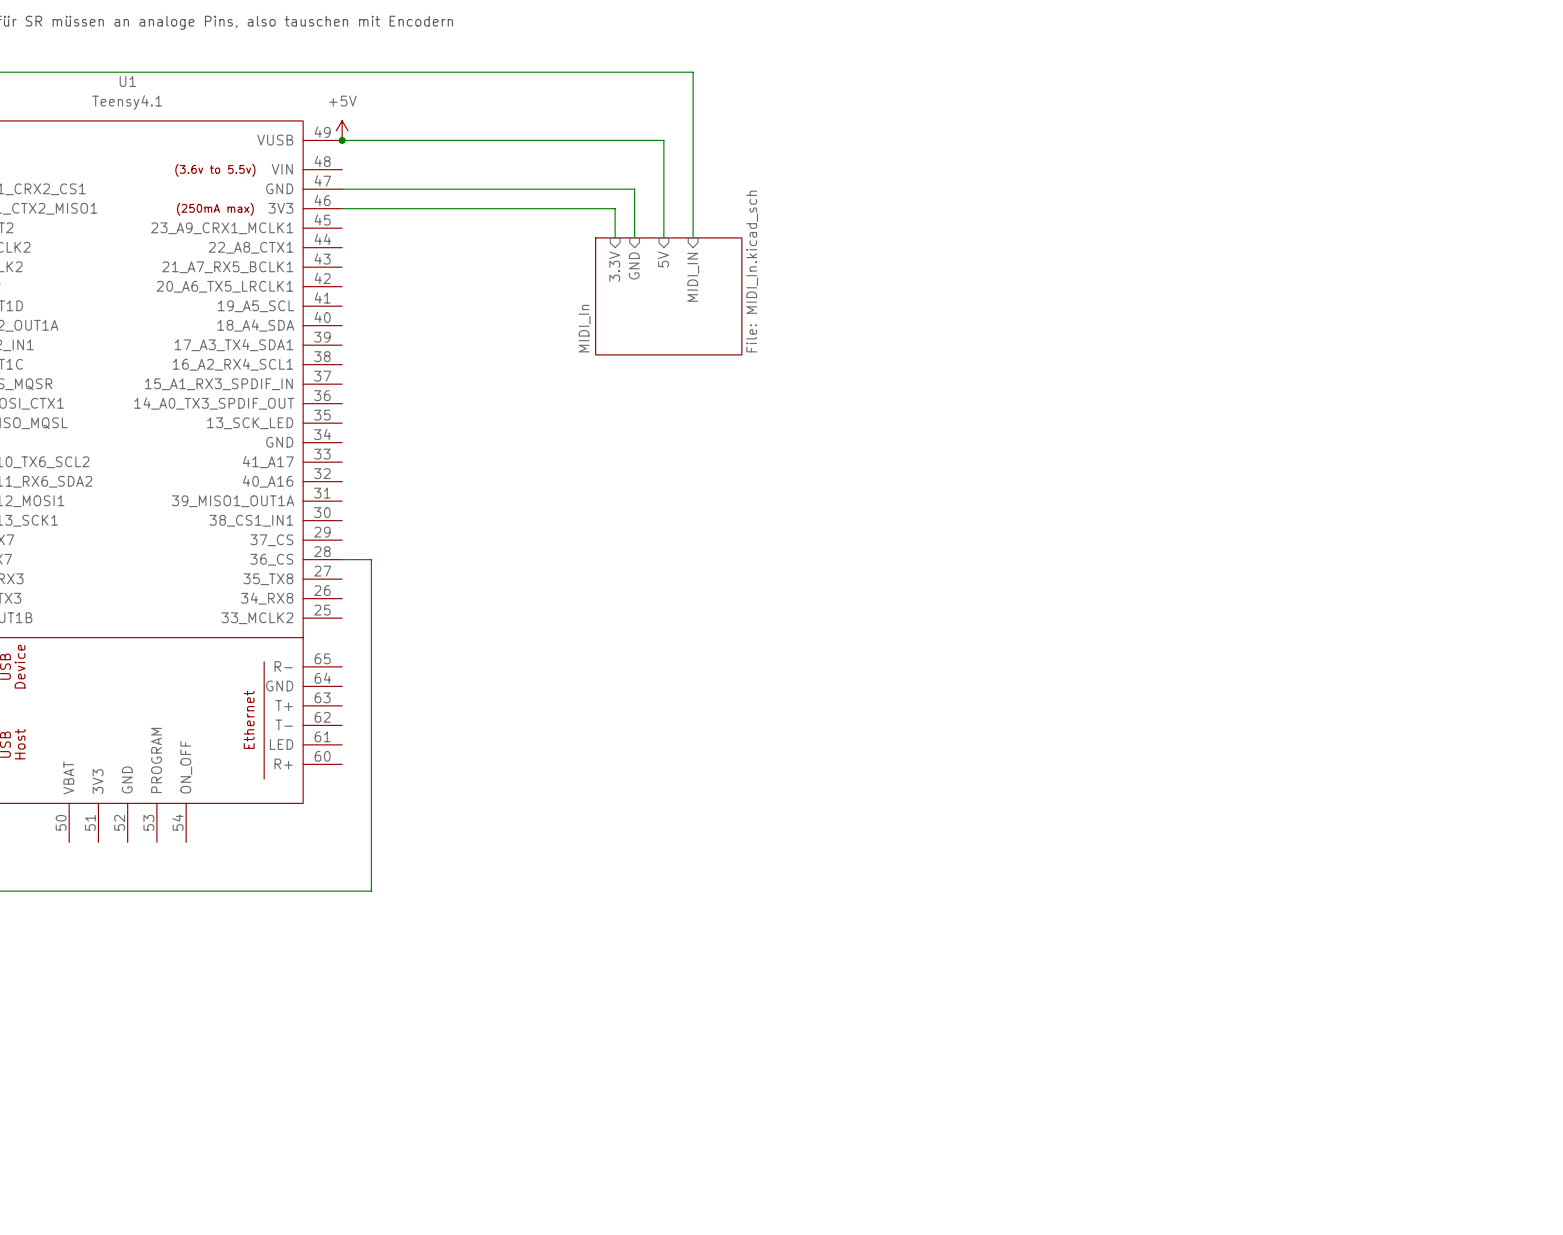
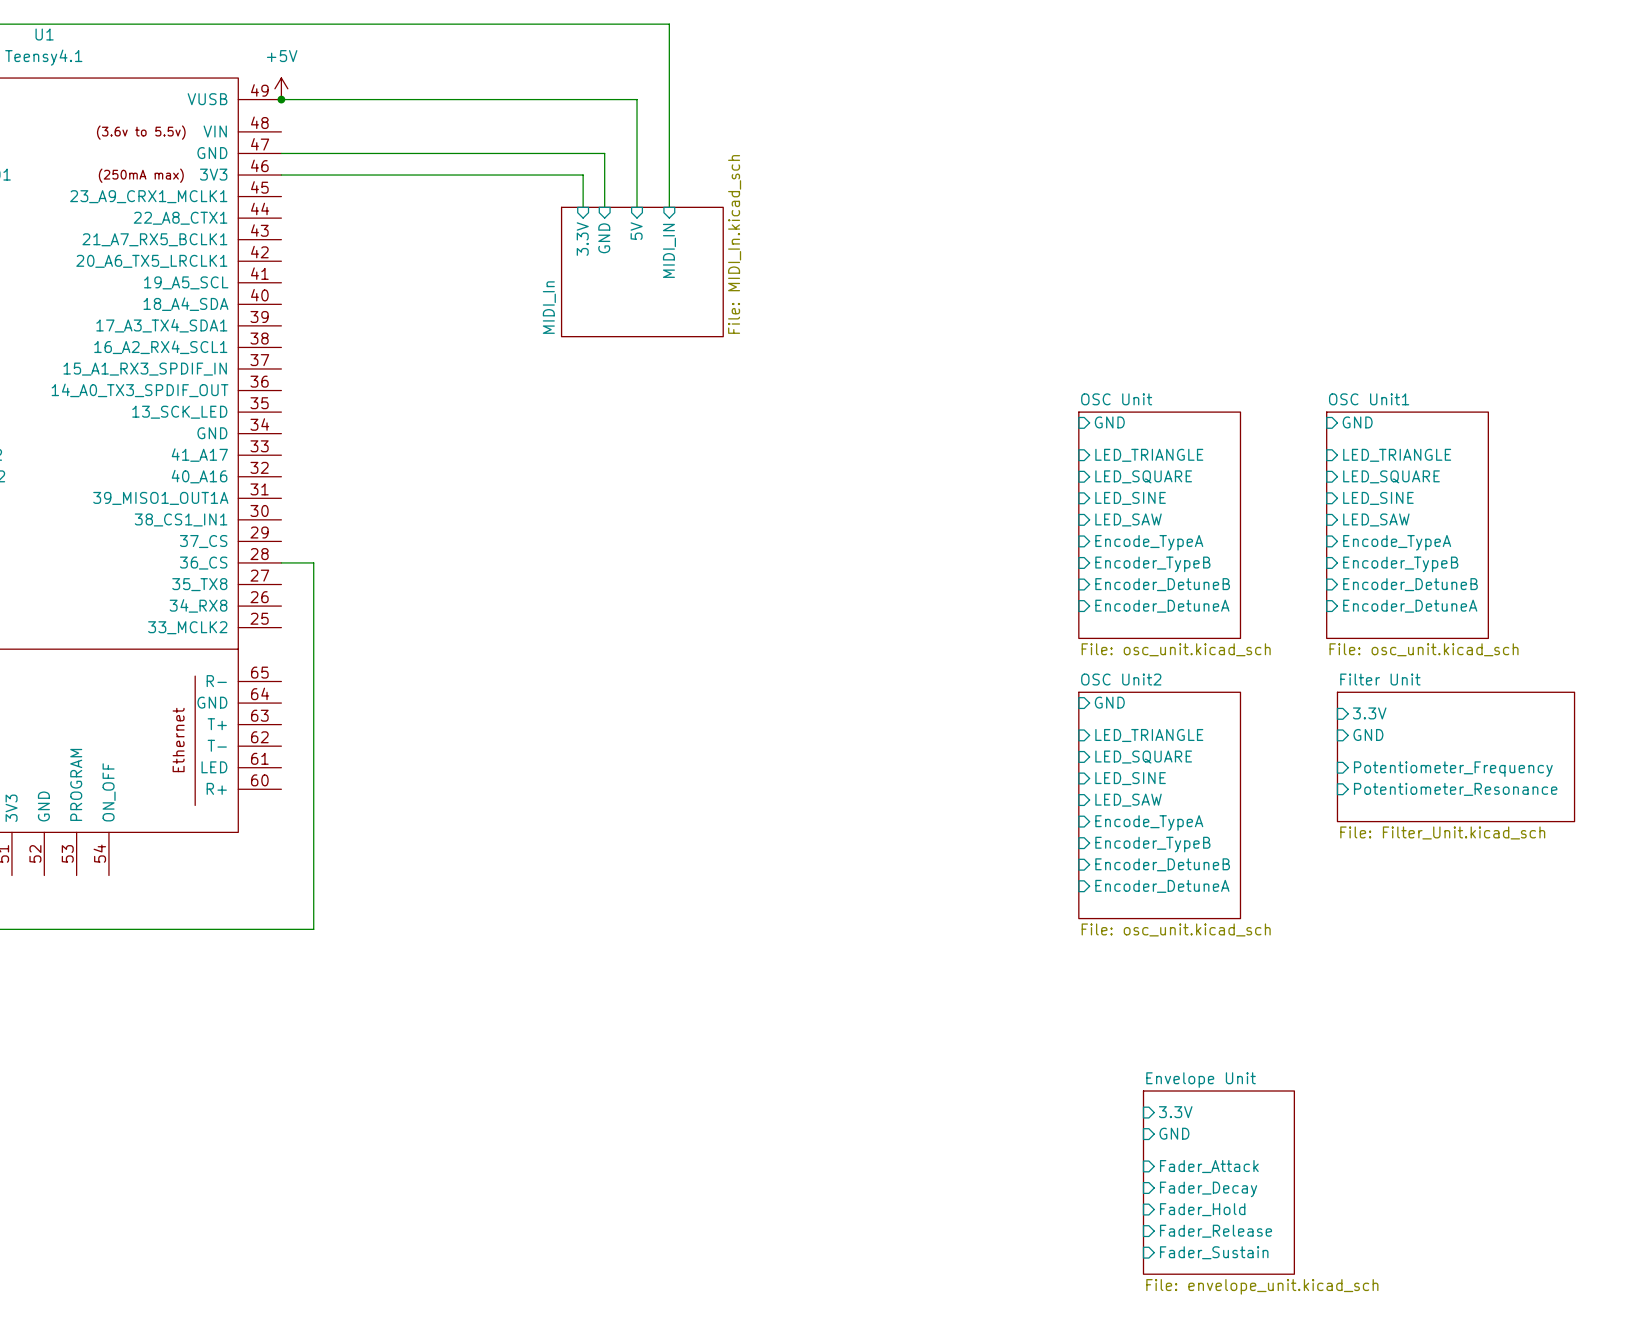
sheet pin: none -> GND (1109, 422)
sheet pin: none -> GND (1357, 422)
sheet pin: none -> LED_TRIANGLE (1149, 455)
sheet pin: none -> LED_TRIANGLE (1397, 455)
sheet pin: none -> LED_SQUARE (1143, 476)
sheet pin: none -> LED_SQUARE (1391, 476)
sheet pin: none -> LED_SINE (1130, 498)
sheet pin: none -> LED_SINE (1378, 498)
sheet pin: none -> LED_SAW (1128, 519)
sheet pin: none -> LED_SAW (1376, 519)
sheet OSC Unit: none -> File: osc_unit.kicad_sch (1159, 525)
sheet OSC Unit1: none -> File: osc_unit.kicad_sch (1407, 525)
sheet pin: none -> Encode_TypeA (1149, 542)
sheet pin: none -> Encode_TypeA (1397, 542)
sheet pin: none -> Encoder_TypeB (1152, 564)
sheet pin: none -> Encoder_TypeB (1400, 564)
sheet pin: none -> Encoder_DetuneB (1162, 584)
sheet pin: none -> Encoder_DetuneB (1410, 584)
sheet pin: none -> Encoder_DetuneA (1162, 606)
sheet pin: none -> Encoder_DetuneA (1410, 606)
sheet pin: none -> GND (1109, 702)
sheet pin: none -> 3.3V (1369, 713)
sheet pin: none -> LED_TRIANGLE (1149, 735)
sheet pin: none -> GND (1368, 734)
sheet pin: none -> LED_SQUARE (1143, 757)
sheet Filter Unit: none -> File: Filter_Unit.kicad_sch (1456, 756)
sheet pin: none -> Potentiometer_Frequency (1453, 769)
sheet pin: none -> LED_SINE (1130, 778)
sheet pin: none -> Potentiometer_Resonance (1455, 789)
sheet pin: none -> LED_SAW (1128, 800)
sheet OSC Unit2: none -> File: osc_unit.kicad_sch (1159, 805)
sheet pin: none -> Encode_TypeA (1149, 822)
sheet pin: none -> Encoder_TypeB (1152, 844)
sheet pin: none -> Encoder_DetuneB (1162, 864)
sheet pin: none -> Encoder_DetuneA (1162, 886)
sheet pin: none -> 3.3V (1175, 1112)
sheet pin: none -> GND (1174, 1133)
sheet pin: none -> Fader_Attack (1209, 1166)
sheet Envelope Unit: none -> File: envelope_unit.kicad_sch (1218, 1182)
sheet pin: none -> Fader_Decay (1208, 1189)
sheet pin: none -> Fader_Hold (1202, 1209)
sheet pin: none -> Fader_Release (1216, 1231)
sheet pin: none -> Fader_Sustain (1214, 1252)

